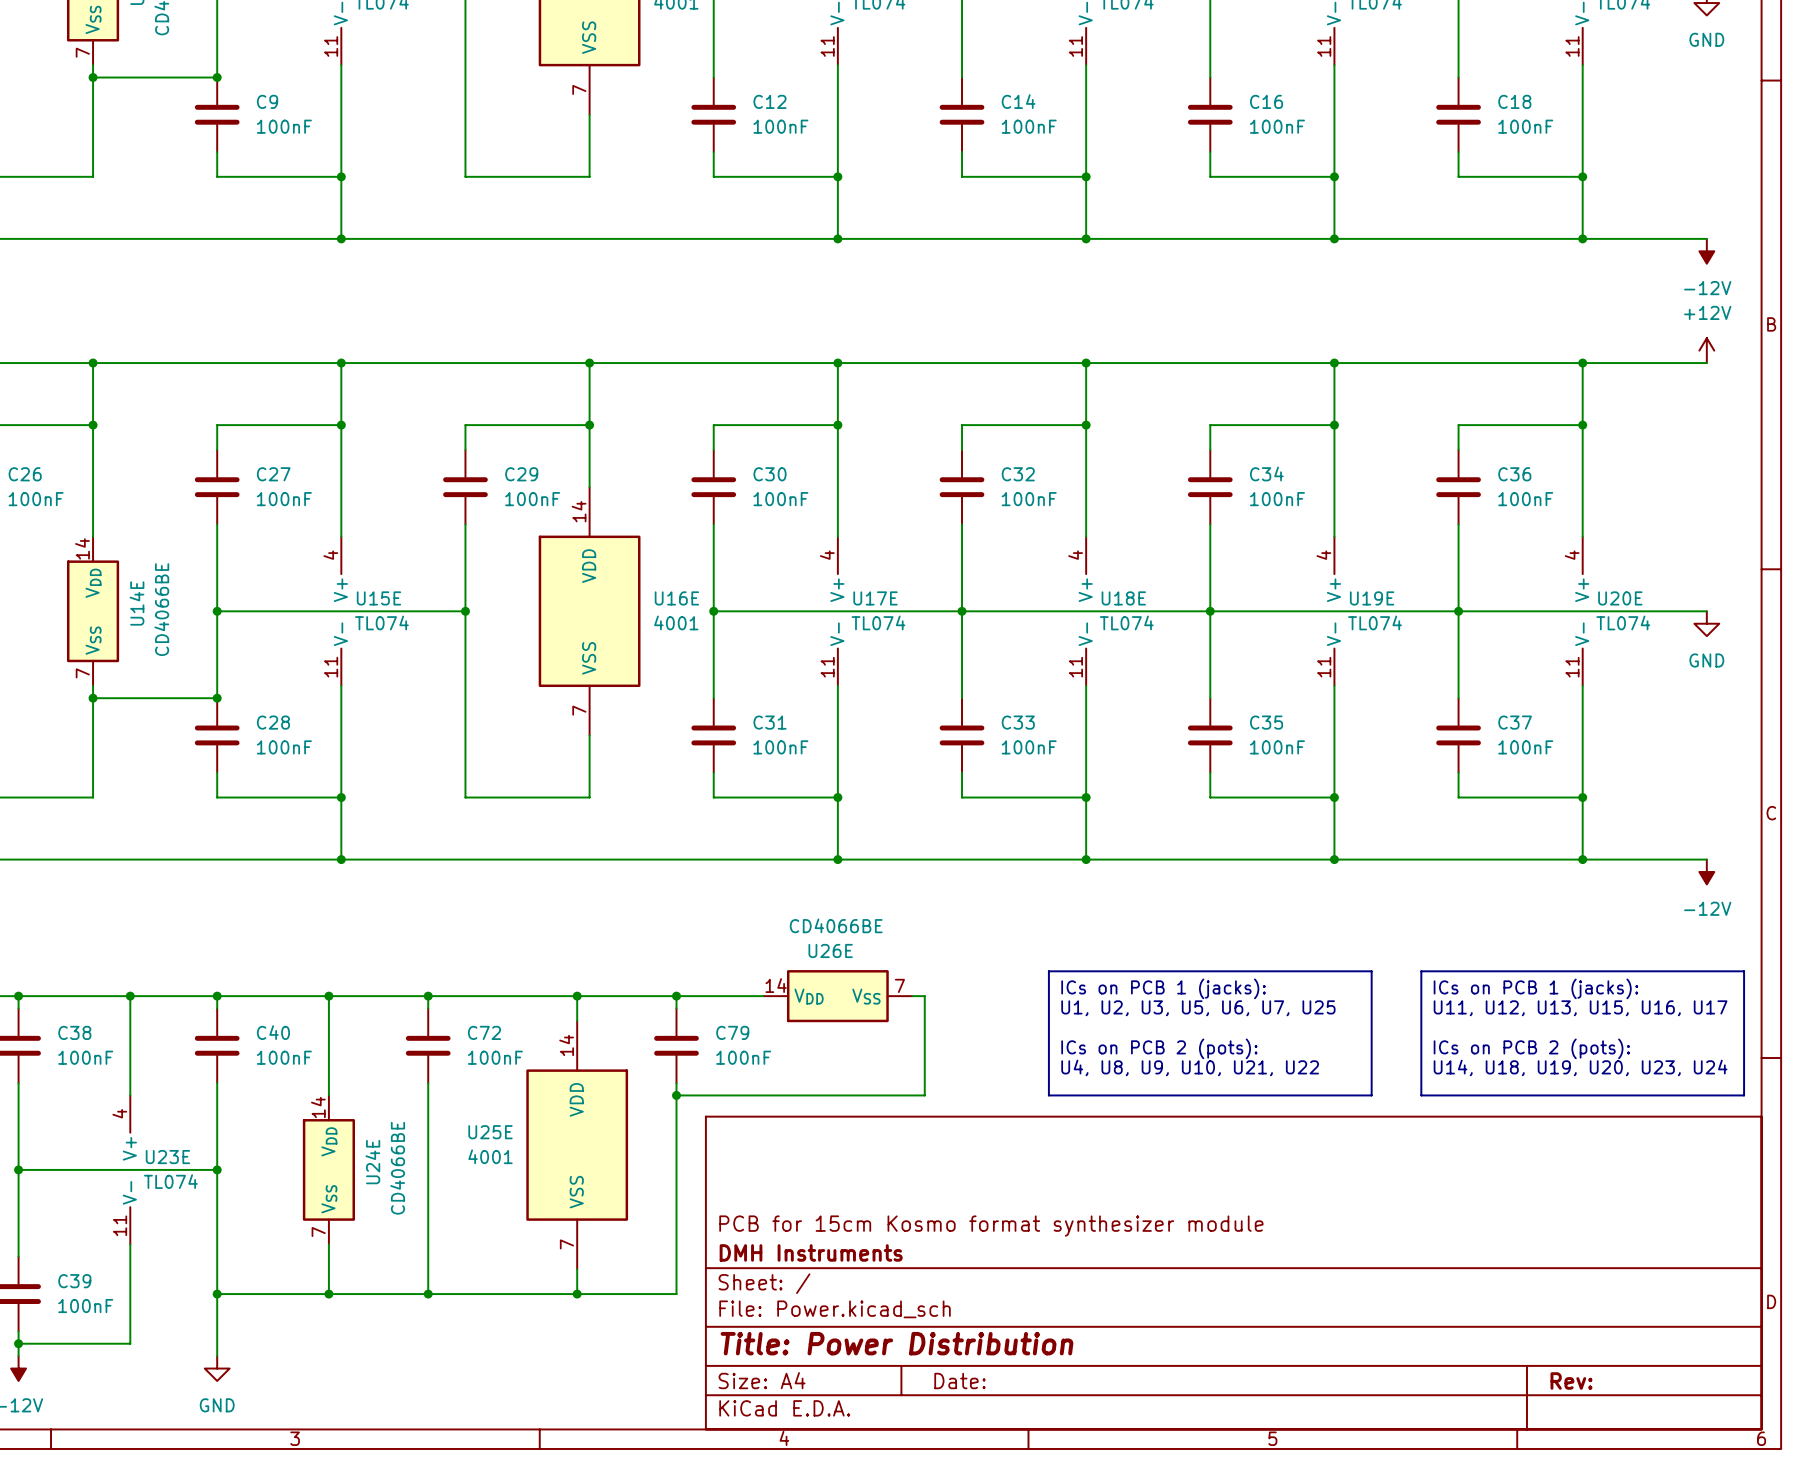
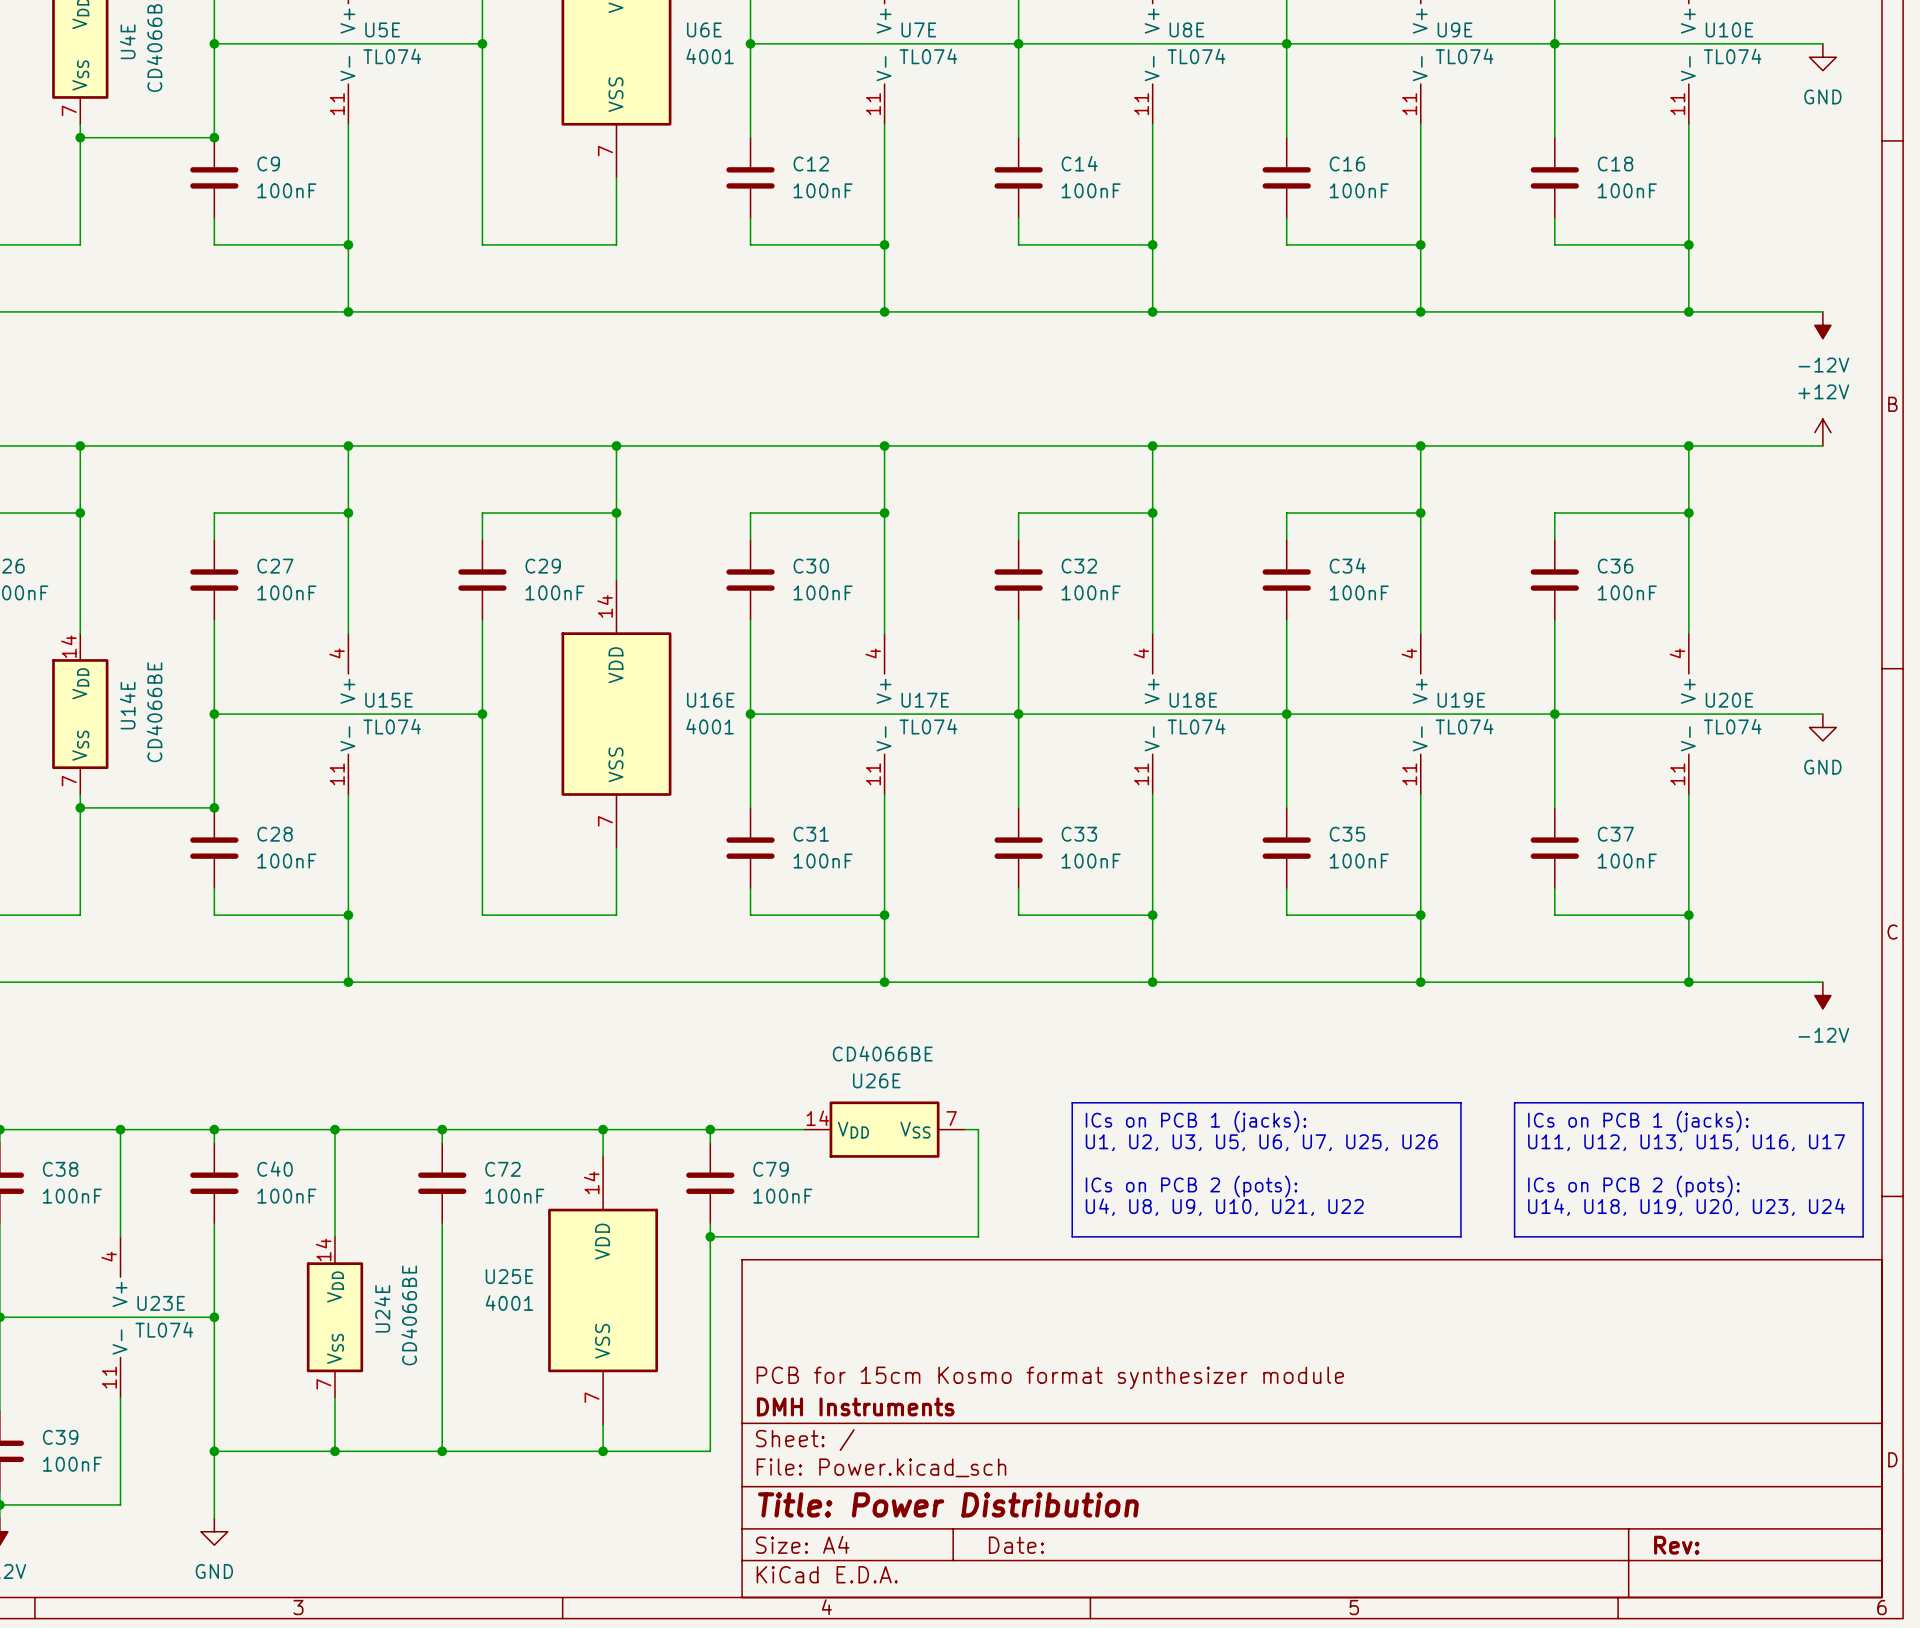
line: (1048, 971) (1048, 1095) -> (1112, 1102) (1072, 1102) (1072, 1236) (1112, 1236)
text position: ICs on PCB 1 (jacks): (1163, 988) -> ICs on PCB 1 (jacks): (1196, 1121)
text: U1, U2, U3, U5, U6, U7, U25 (1198, 1008) -> U1, U2, U3, U5, U6, U7, U25, U26 (1261, 1142)
text position: ICs on PCB 2 (pots): (1159, 1048) -> ICs on PCB 2 (pots): (1191, 1186)
text position: U4, U8, U9, U10, U21, U22 (1190, 1067) -> U4, U8, U9, U10, U21, U22 (1224, 1207)

